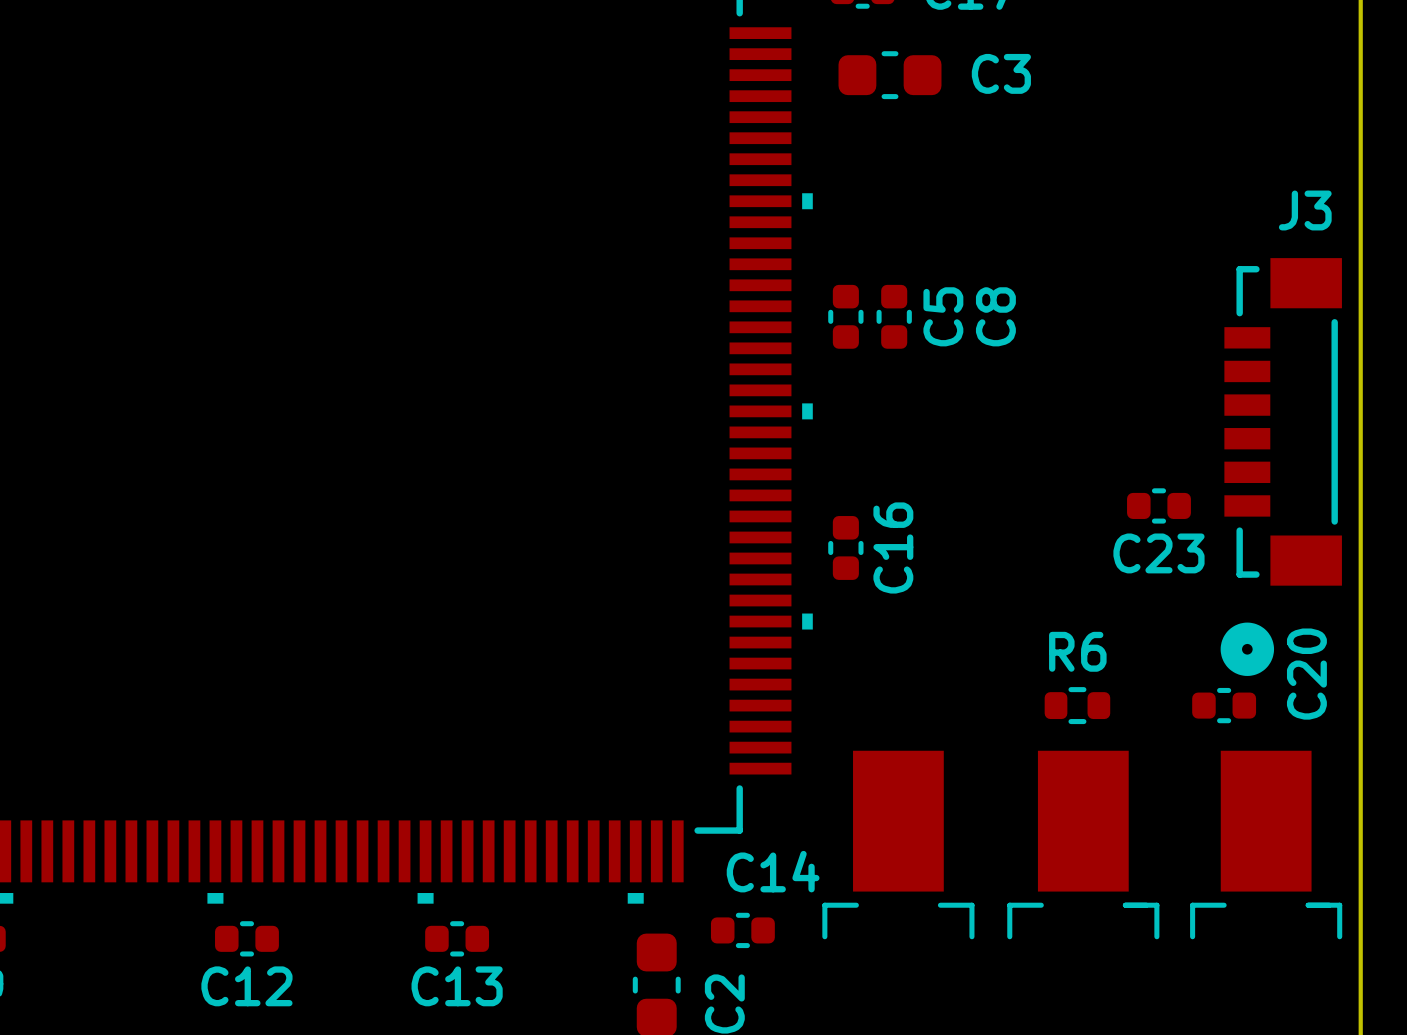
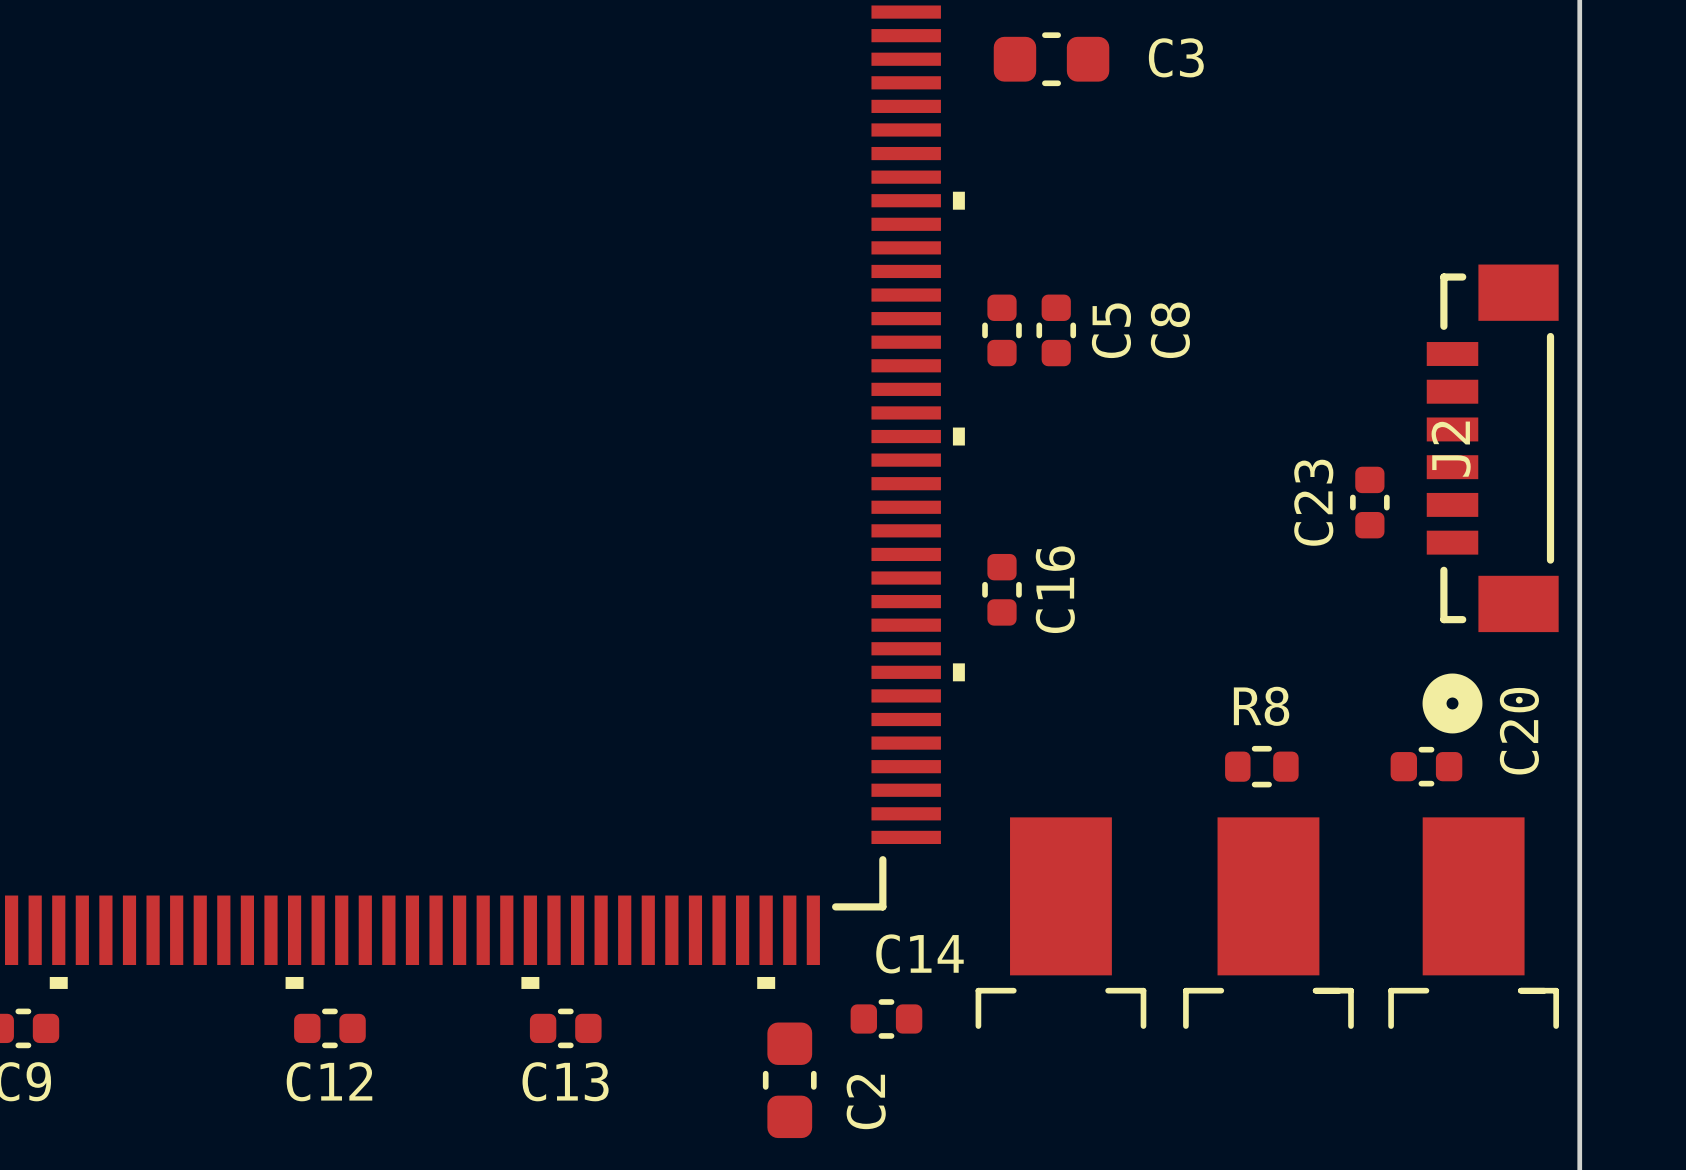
J3 name: J3 (1305, 210) -> J2 (1451, 449)
C23 rotation: 0° (1158, 505) -> 90° clockwise (1369, 502)
C23 position: (1158, 505) -> (1369, 502)
R6 name: R6 (1077, 651) -> R8 (1261, 706)

